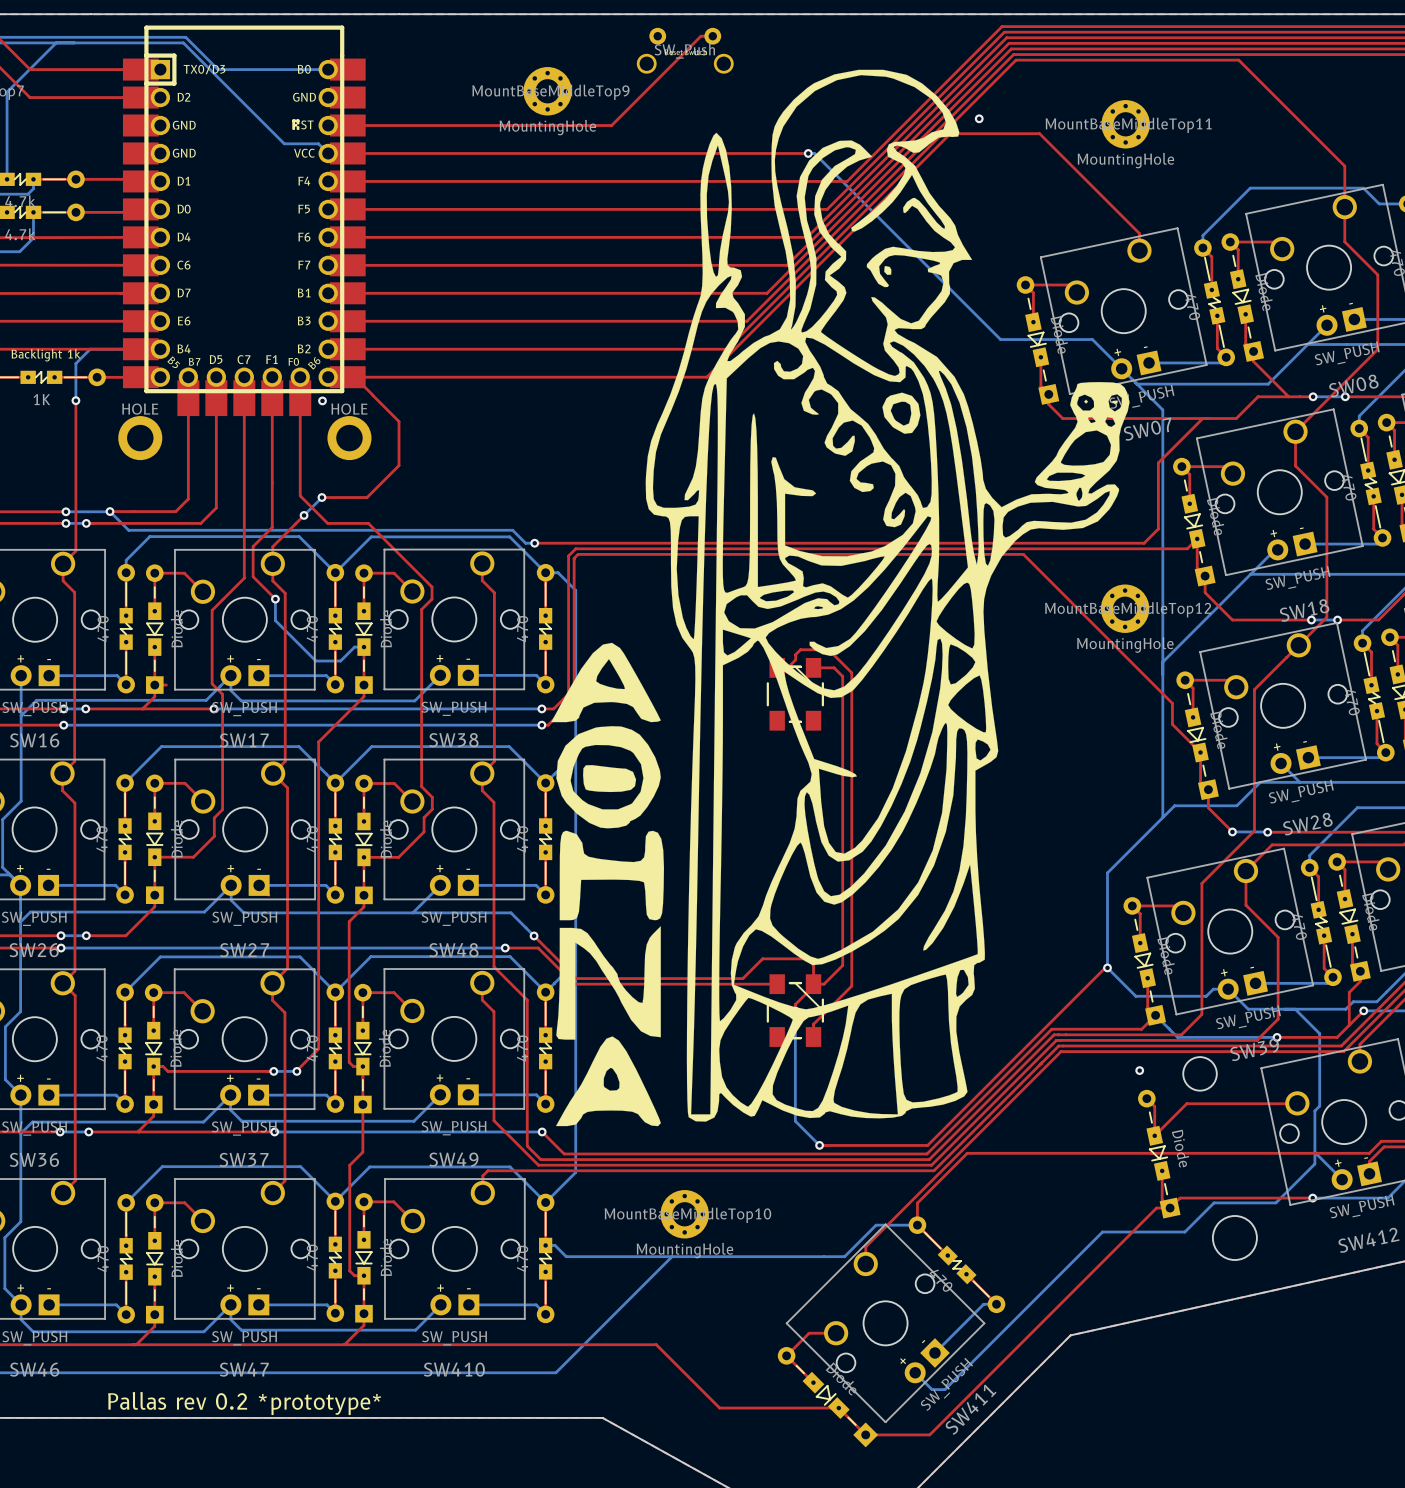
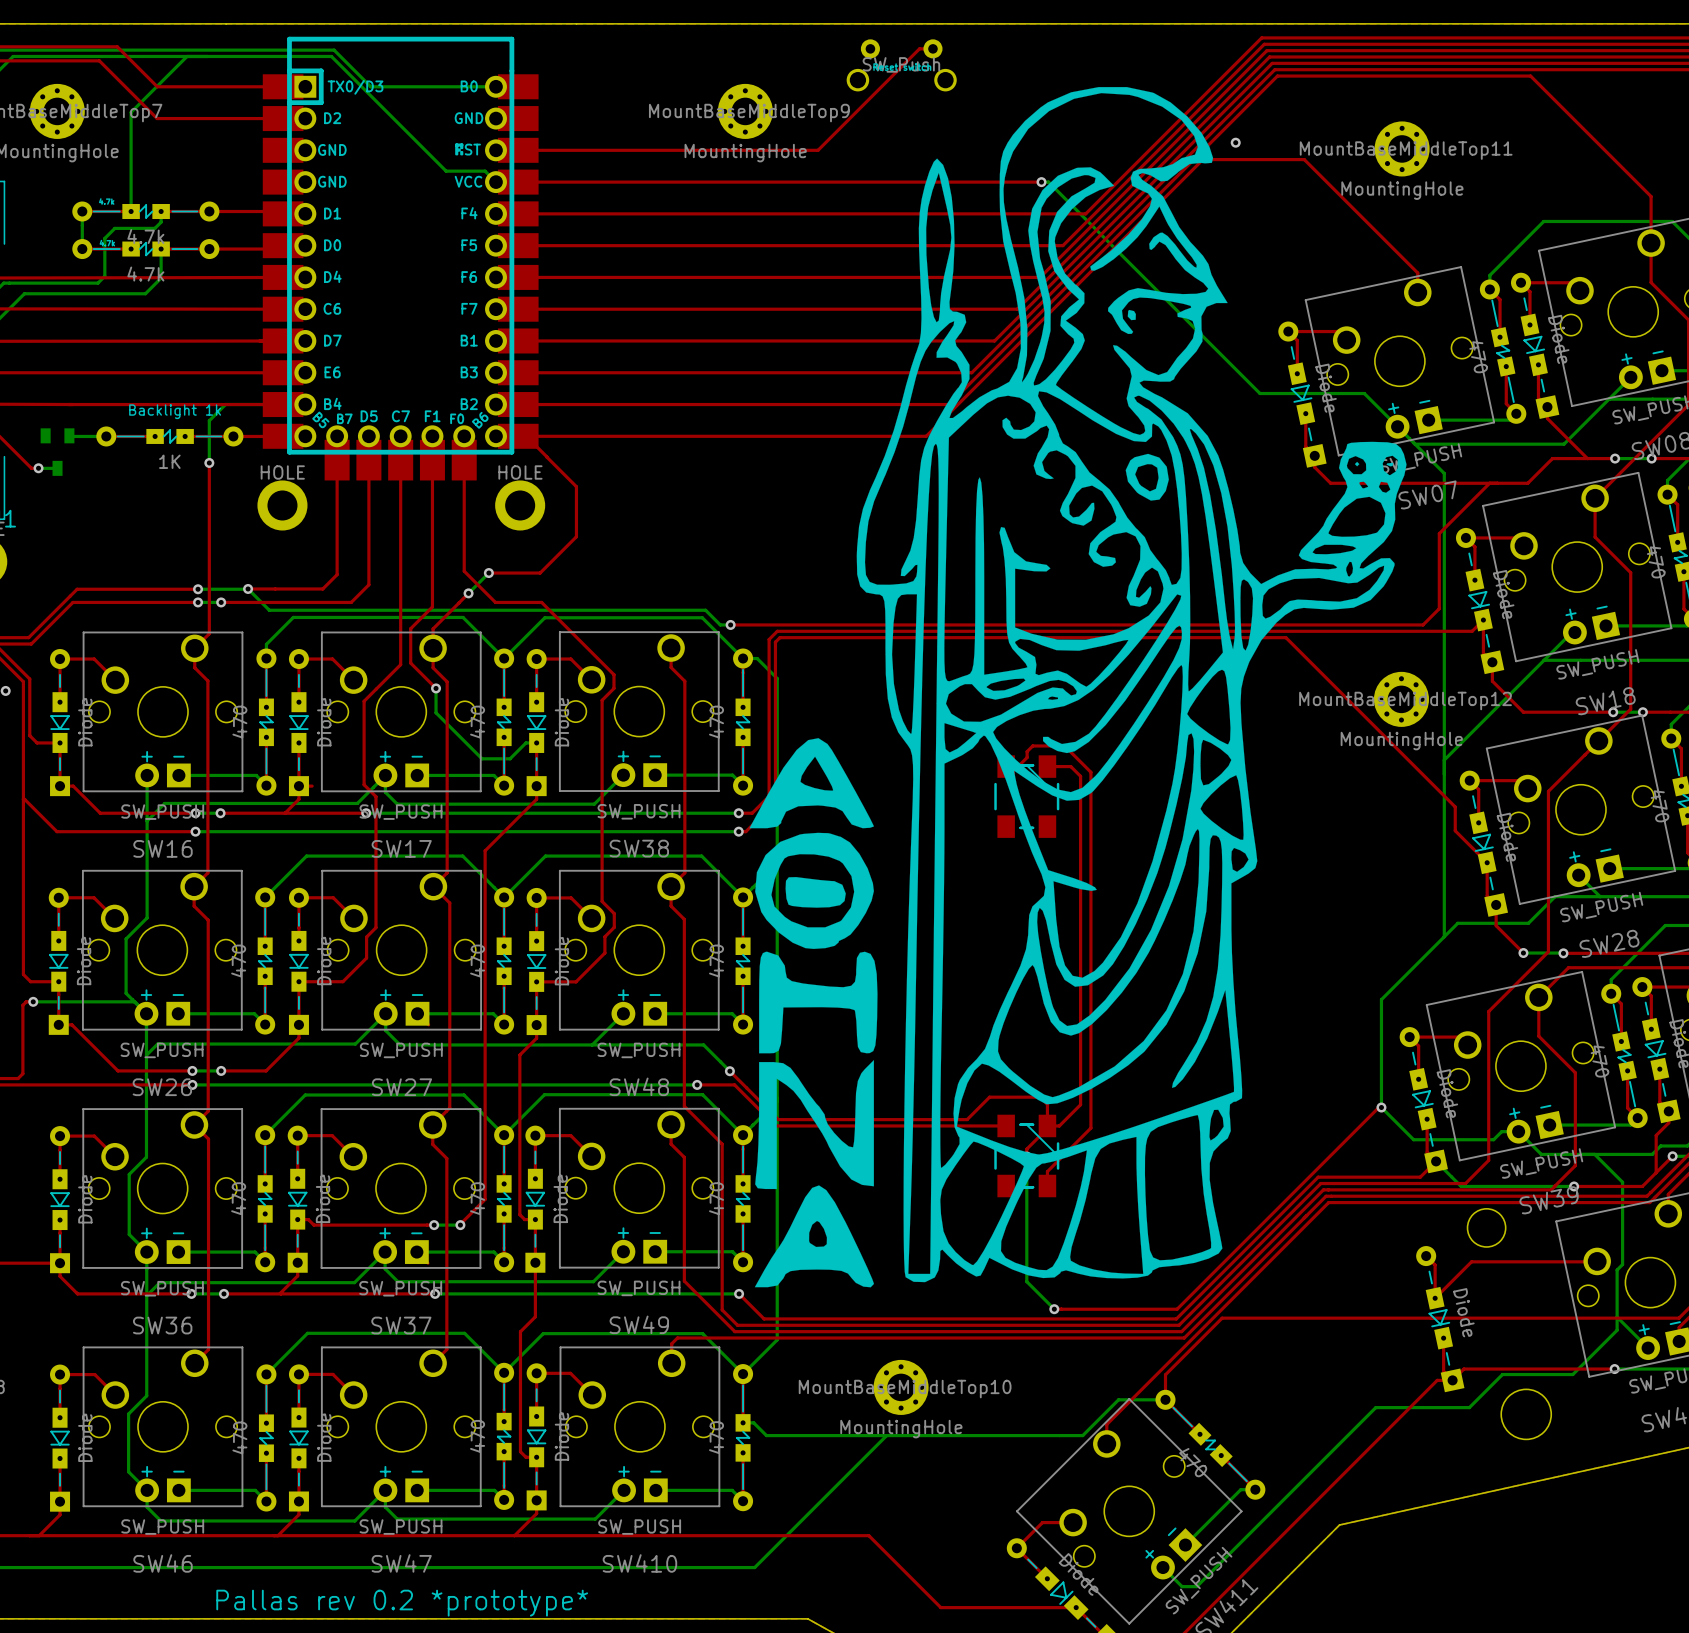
via: (322, 400) -> none
via: (1139, 1070) -> none

